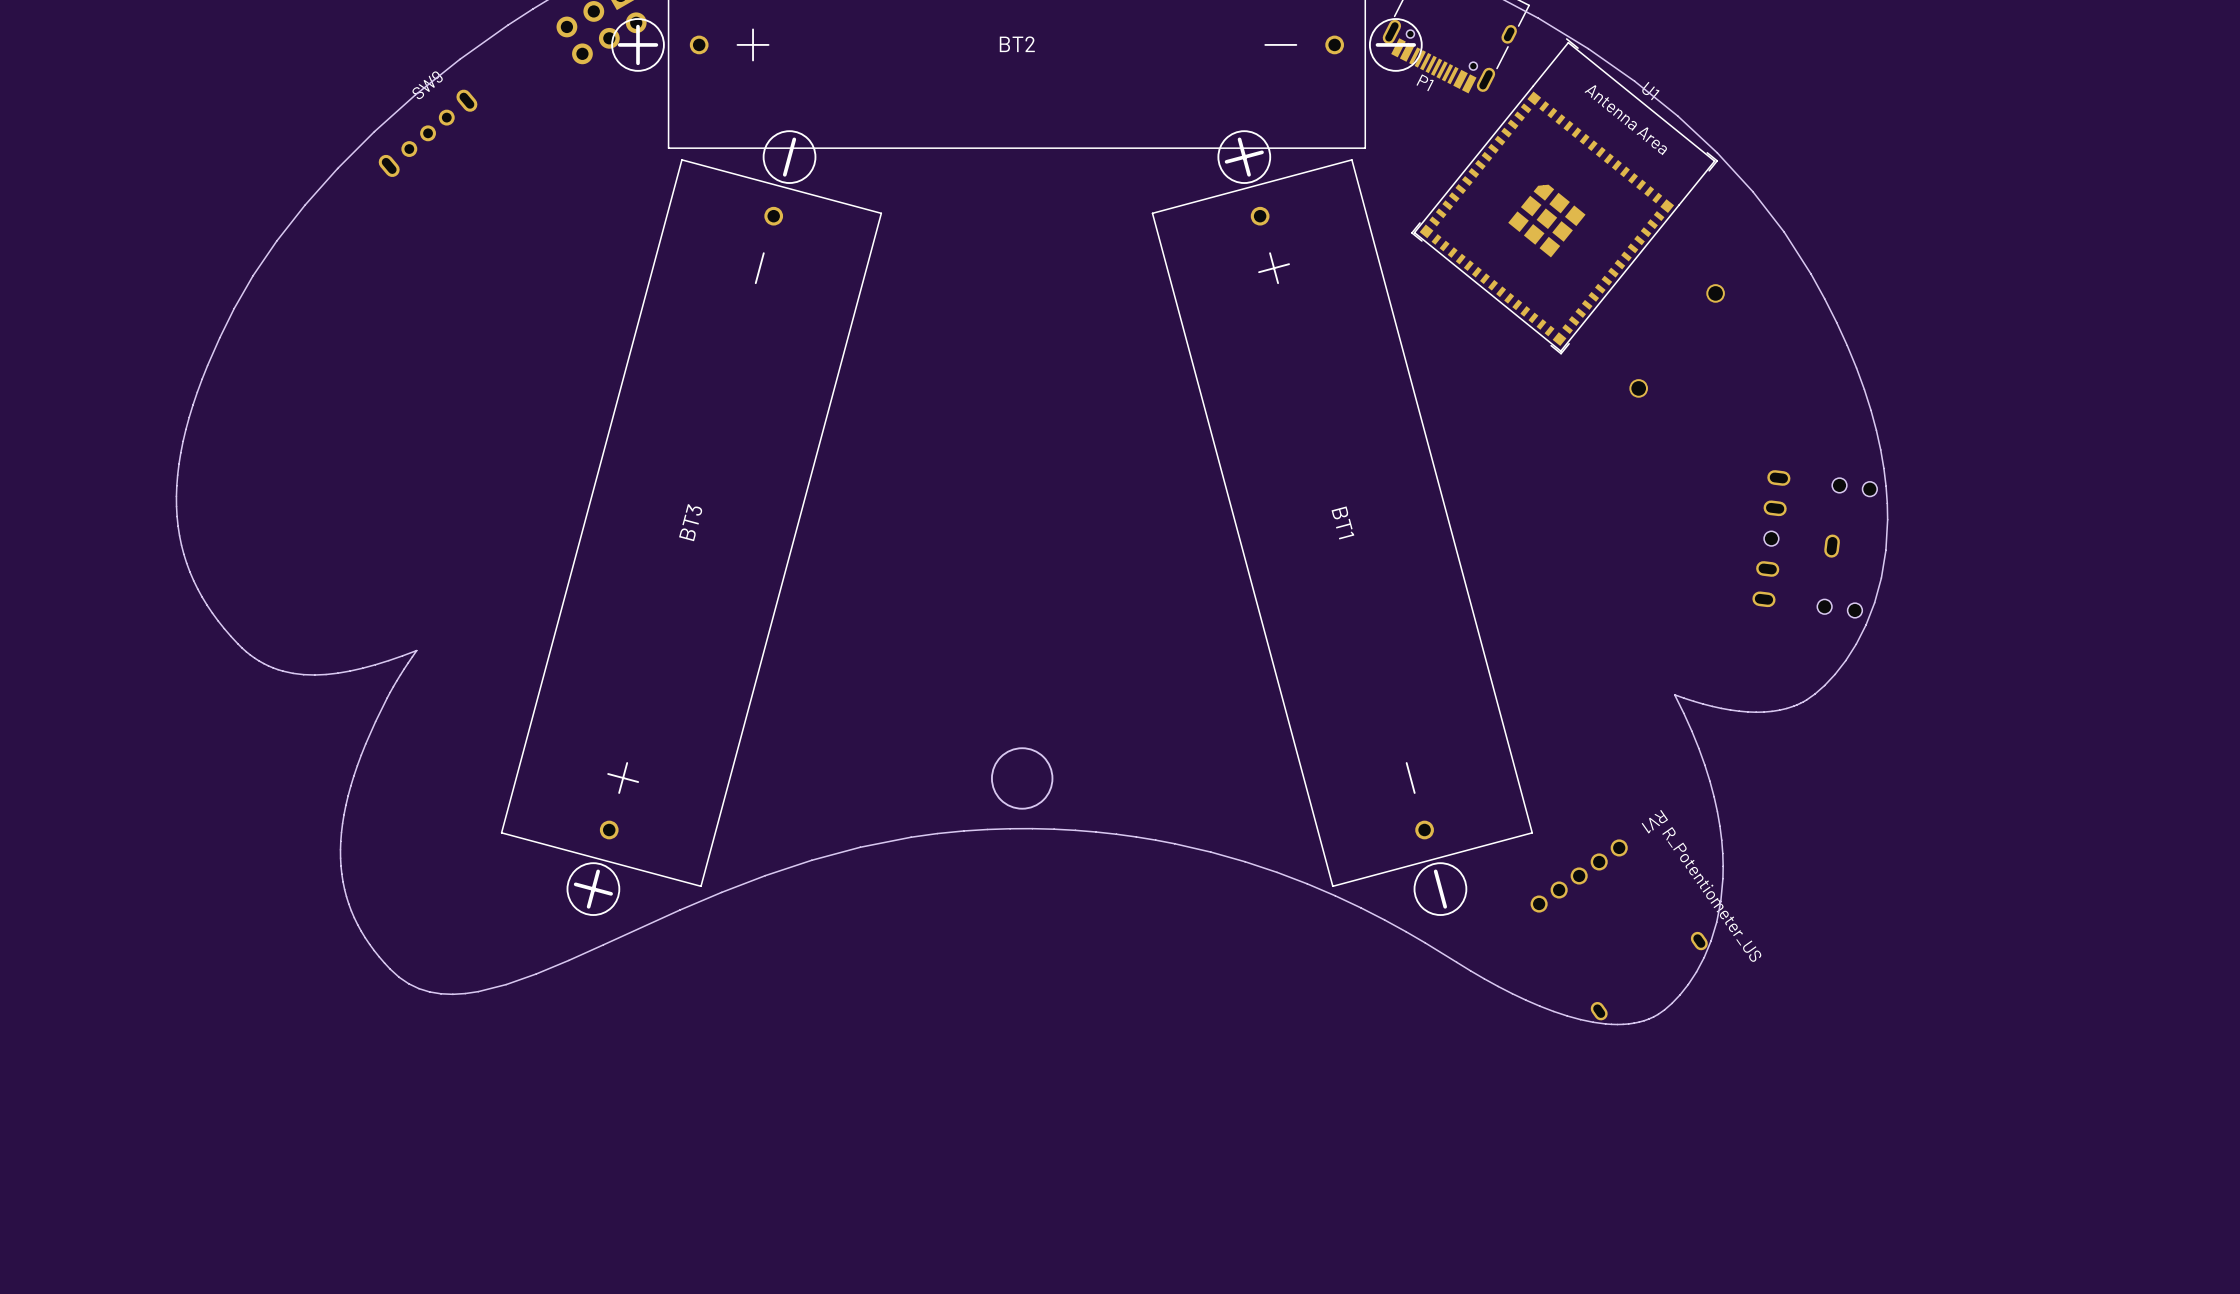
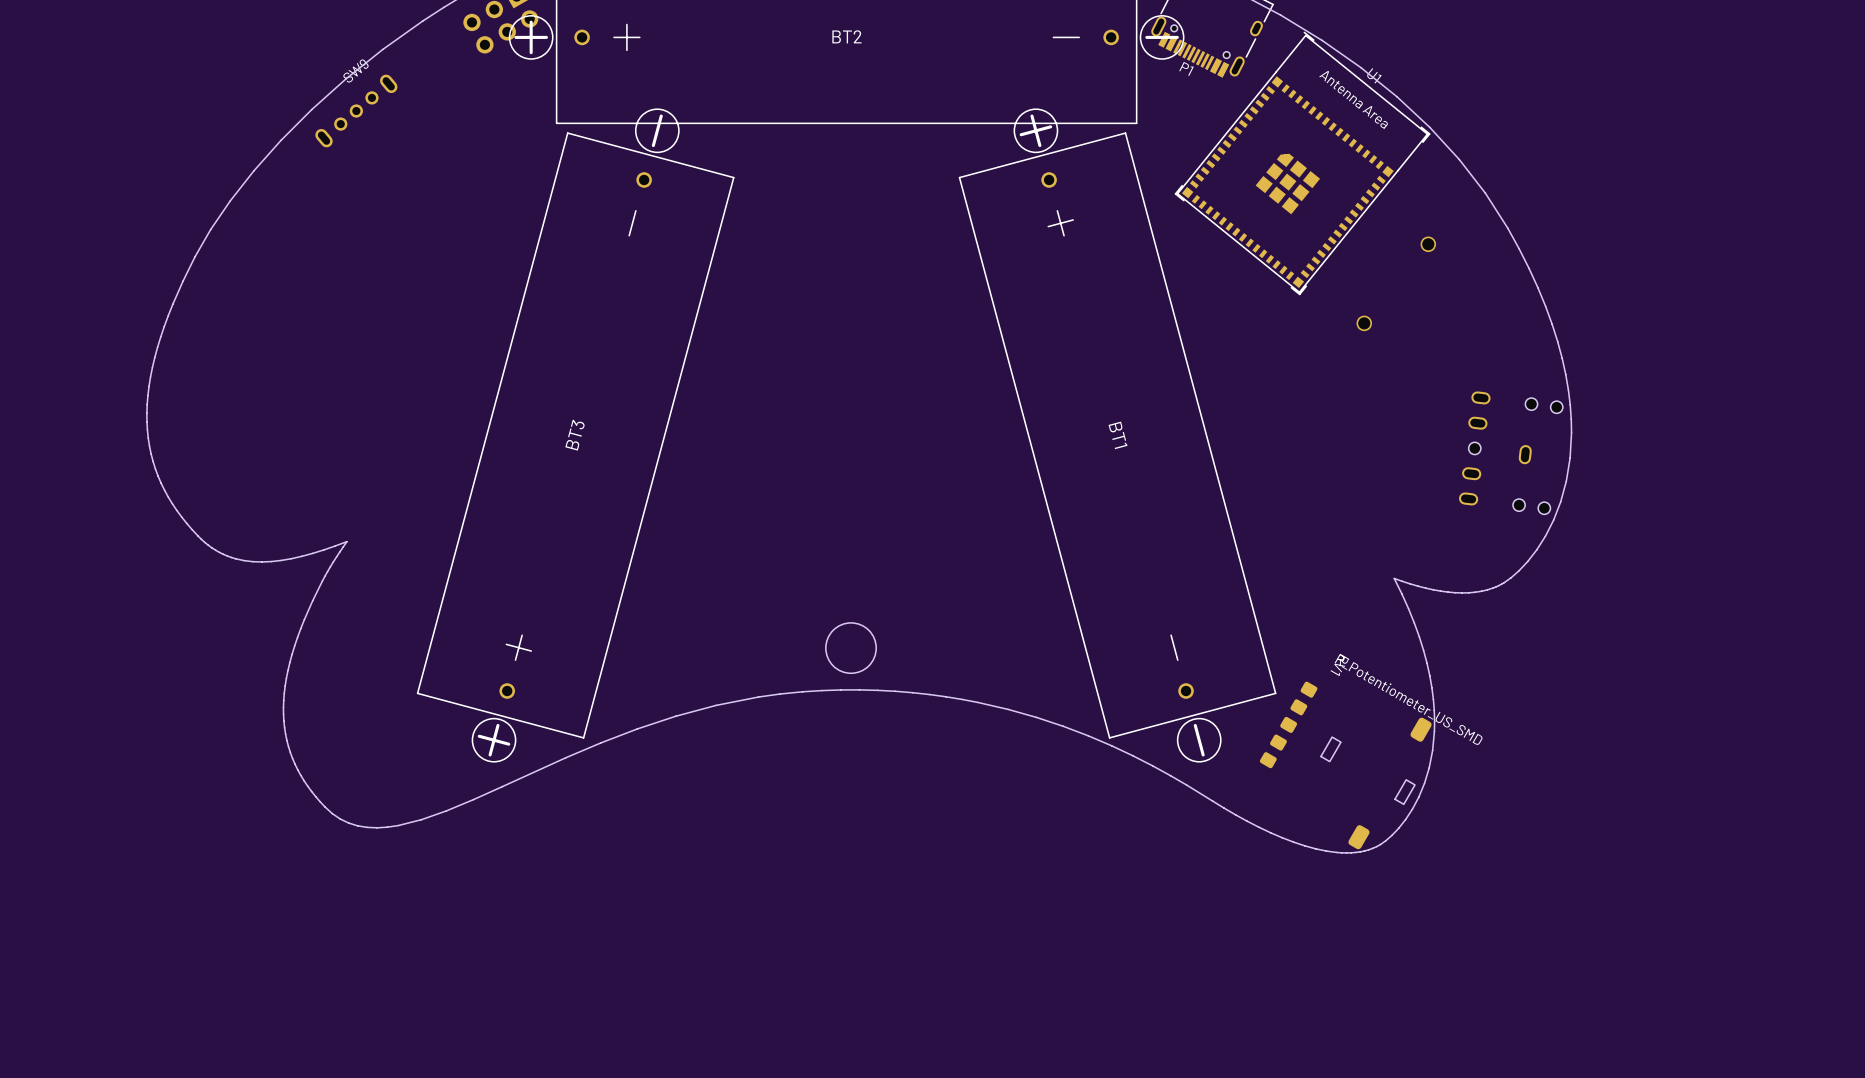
RV1 name position: RV1 (1654, 821) -> RV1 (1339, 664)
RV1 footprint: [1530, 839, 1708, 1021] -> [1259, 681, 1432, 850]
RV1 value: R_Potentiometer_US (1711, 894) -> R_Potentiometer_US_SMD (1408, 699)

